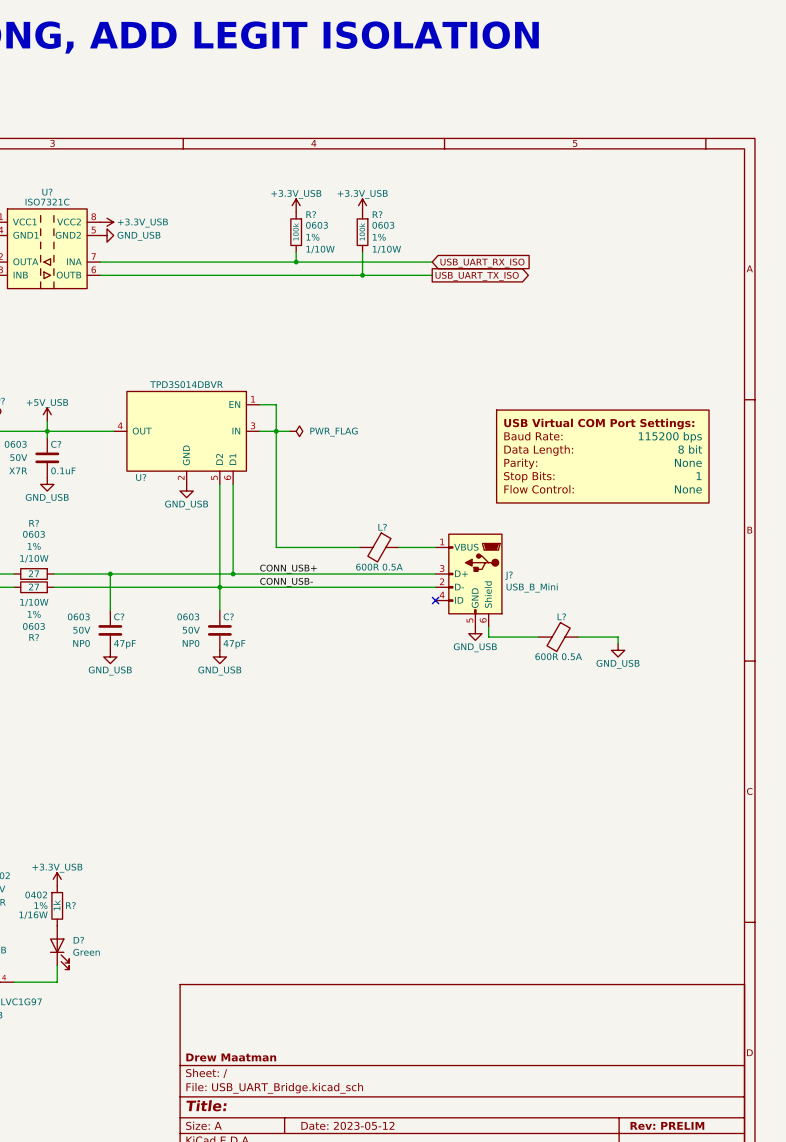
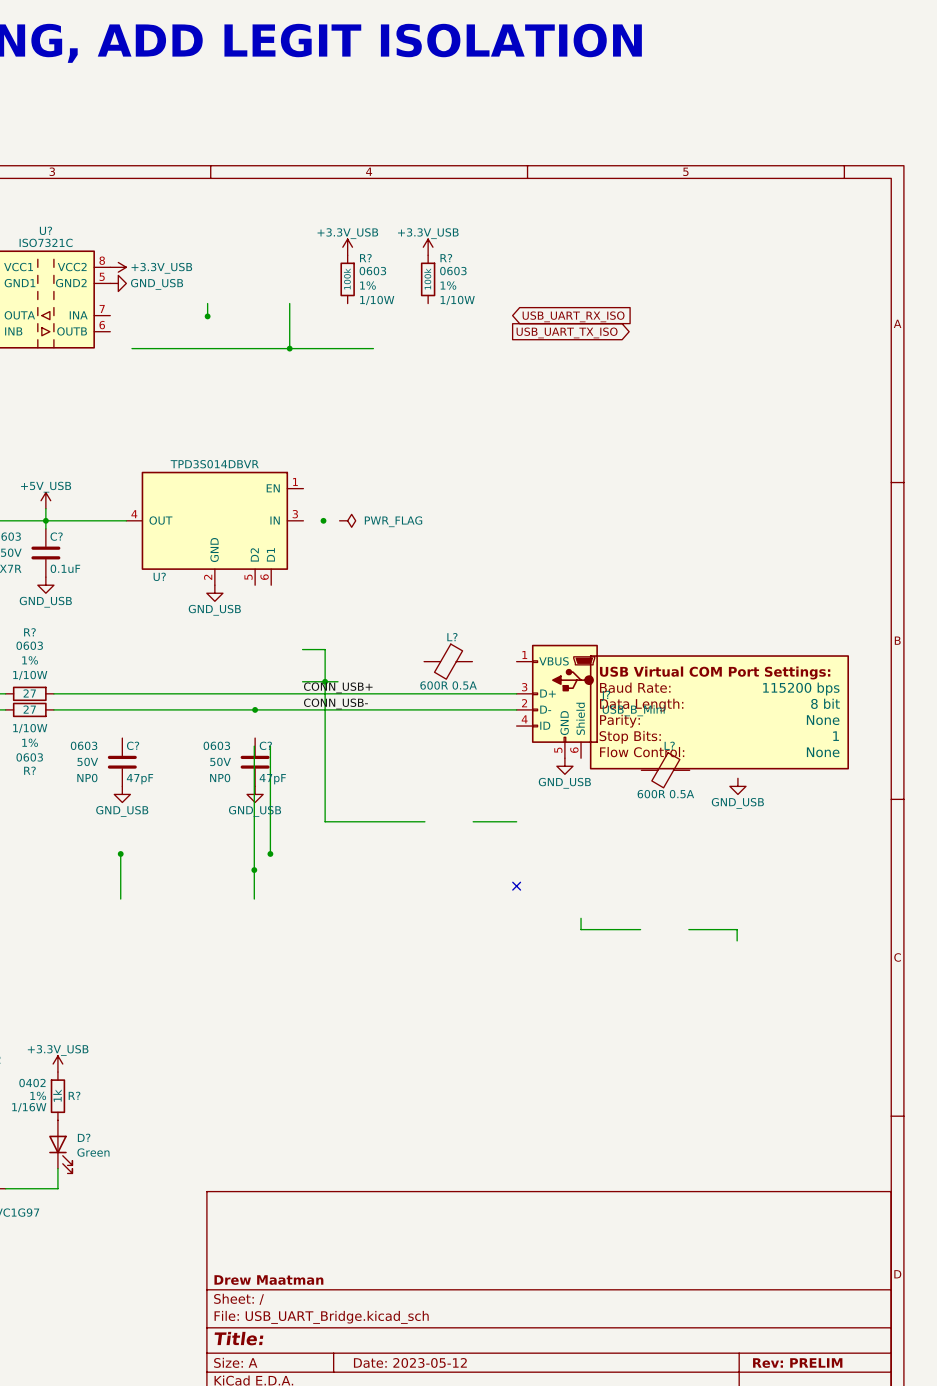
wire: none -> (207, 303) (207, 316)
wire: none -> (289, 303) (289, 348)
wire: (296, 252) (296, 262) -> none
wire: (362, 252) (362, 275) -> none
wire: (100, 262) (432, 262) -> none
junction: none -> (207, 316)
junction: (296, 262) -> none
wire: (100, 275) (432, 275) -> none
junction: (362, 275) -> none
wire: none -> (131, 348) (373, 348)
junction: none -> (289, 348)
wire: (259, 404) (276, 404) (276, 547) (359, 547) -> none
wire: (259, 431) (289, 431) -> none
part: (602, 456) -> none
wire: (219, 484) (219, 610) -> none
wire: (233, 484) (233, 574) -> none
wire: none -> (302, 649) (325, 649) (325, 821) (424, 821)
wire: (399, 547) (435, 547) -> none
wire: none -> (302, 681) (337, 681)
junction: none -> (325, 681)
wire: (110, 574) (110, 610) -> none
junction: (110, 574) -> none
junction: (233, 574) -> none
part: none -> (719, 712)
no-connect mark: (435, 600) -> none
wire: none -> (254, 746) (254, 899)
wire: none -> (270, 746) (270, 853)
wire: (488, 627) (488, 637) (538, 637) -> none
wire: (578, 637) (618, 637) (618, 643) -> none
wire: none -> (473, 821) (516, 821)
wire: none -> (120, 853) (120, 899)
junction: none -> (120, 853)
junction: none -> (270, 853)
junction: none -> (254, 870)
no-connect mark: none -> (516, 886)
wire: none -> (581, 918) (581, 929) (640, 929)
wire: none -> (688, 929) (737, 929) (737, 940)

